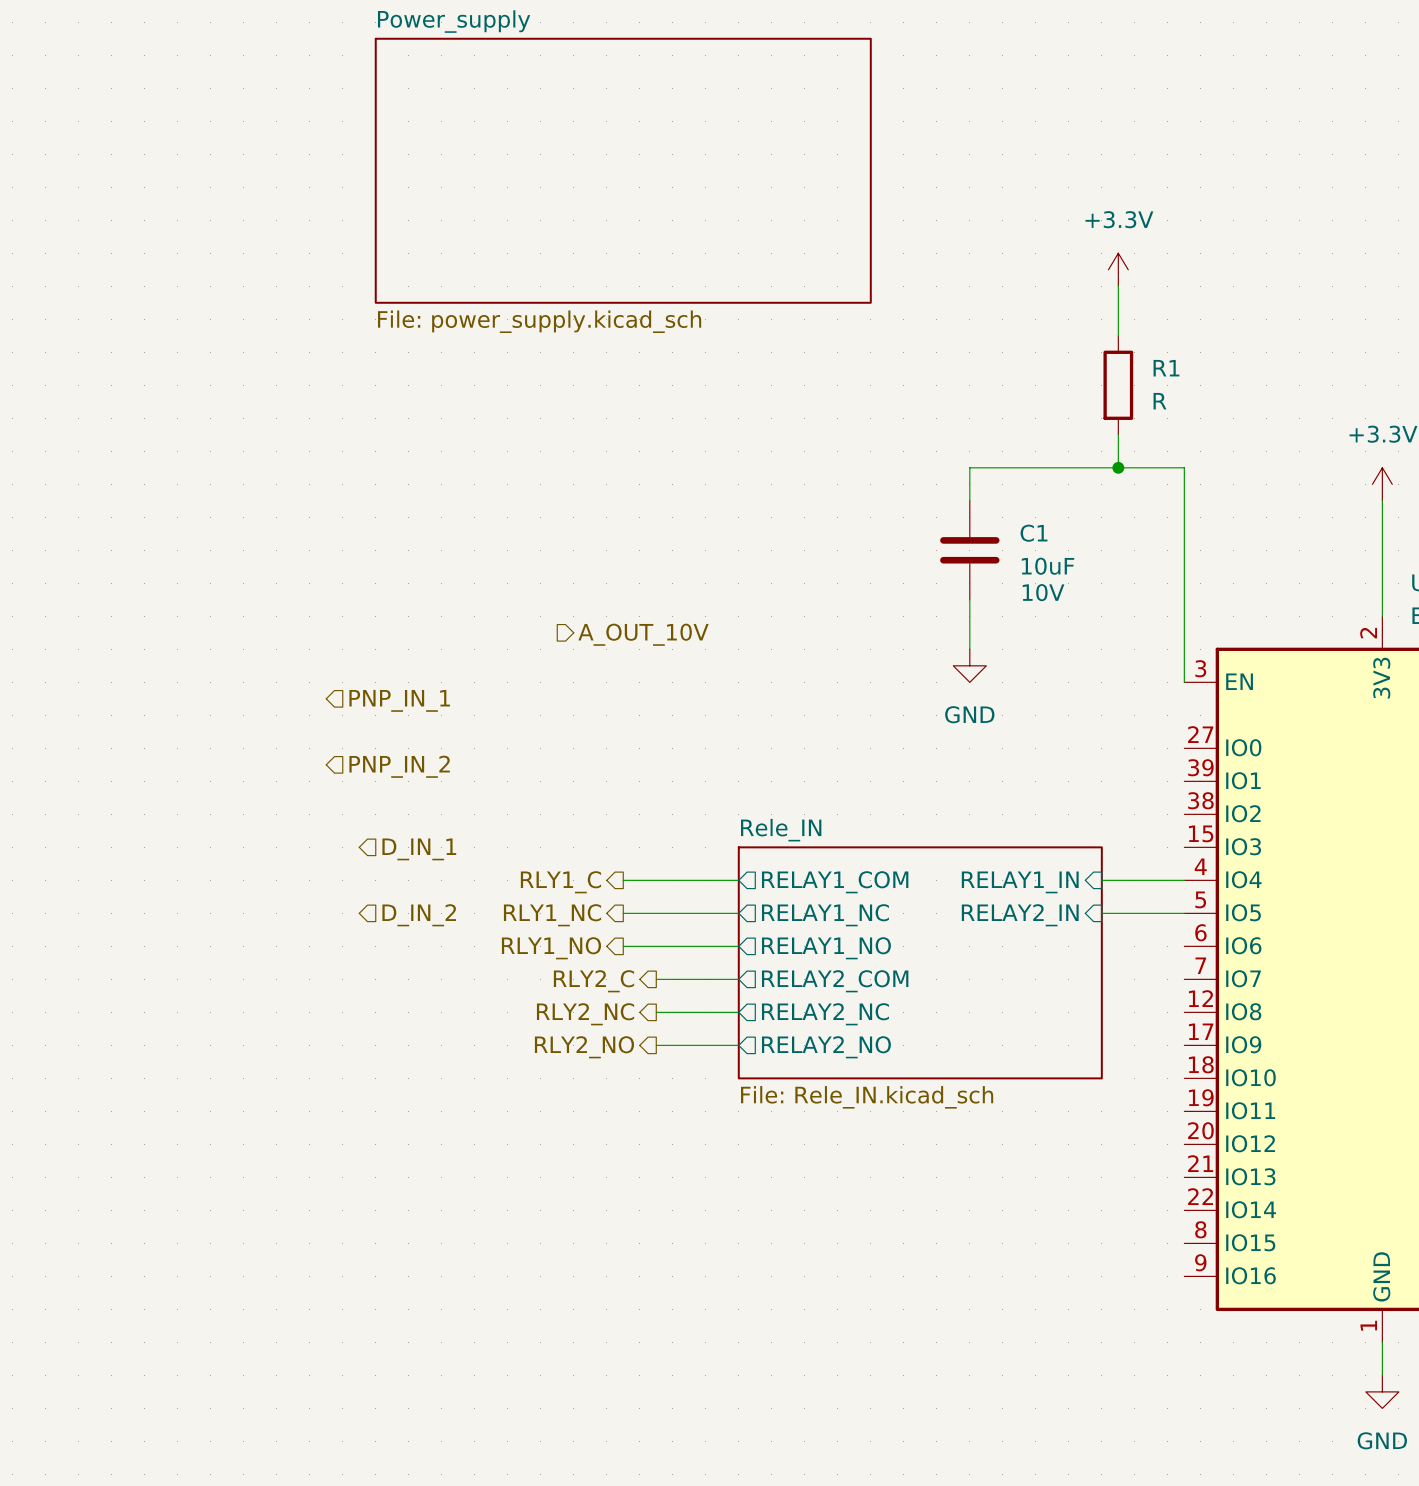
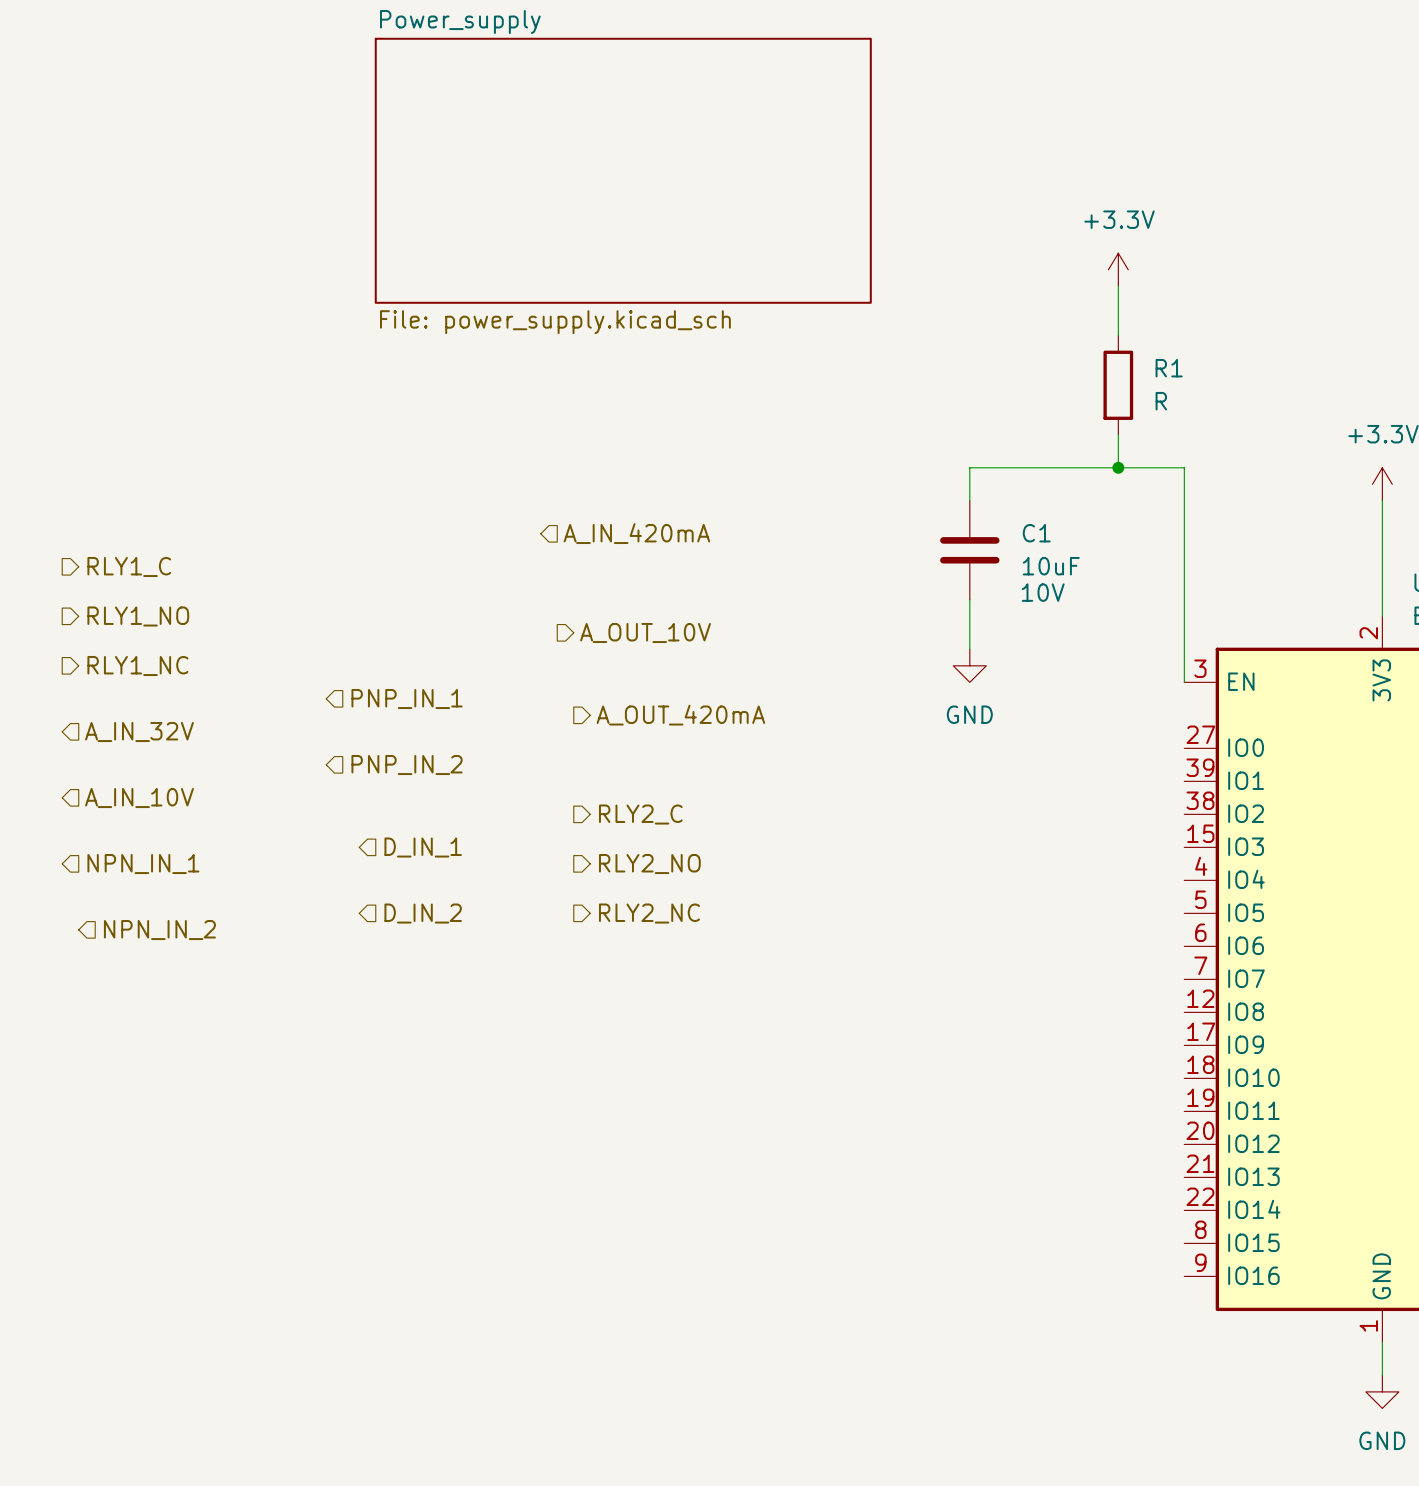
hierarchical label: none -> A_IN_420mA (636, 533)
hierarchical label: none -> RLY1_C (129, 566)
hierarchical label: none -> RLY1_NO (138, 616)
hierarchical label: none -> RLY1_NC (137, 666)
hierarchical label: none -> A_OUT_420mA (680, 715)
hierarchical label: none -> A_IN_32V (139, 732)
hierarchical label: none -> A_IN_10V (139, 798)
hierarchical label: none -> NPN_IN_1 (143, 864)
wire: (623, 880) (738, 880) -> none
wire: (1101, 880) (1184, 880) -> none
hierarchical label: RLY1_C (560, 882) -> none
sheet pin: RELAY1_COM (835, 882) -> none
sheet pin: RELAY1_IN (1020, 882) -> none
wire: (623, 913) (738, 913) -> none
wire: (1101, 913) (1184, 913) -> none
hierarchical label: RLY1_NC (552, 915) -> none
sheet pin: RELAY1_NC (825, 915) -> none
sheet pin: RELAY2_IN (1020, 915) -> none
hierarchical label: none -> NPN_IN_2 (159, 930)
wire: (623, 946) (738, 946) -> none
hierarchical label: RLY1_NO (551, 948) -> none
sheet pin: RELAY1_NO (826, 948) -> none
sheet Rele_IN: File: Rele_IN.kicad_sch (920, 962) -> none
wire: (656, 979) (738, 979) -> none
hierarchical label rotation: 0° (593, 981) -> 180° (640, 814)
hierarchical label position: RLY2_C (593, 981) -> RLY2_C (640, 814)
sheet pin: RELAY2_COM (835, 981) -> none
wire: (656, 1012) (738, 1012) -> none
hierarchical label rotation: 0° (585, 1014) -> 180° (649, 913)
hierarchical label position: RLY2_NC (585, 1014) -> RLY2_NC (649, 913)
sheet pin: RELAY2_NC (825, 1014) -> none
wire: (656, 1045) (738, 1045) -> none
hierarchical label rotation: 0° (584, 1047) -> 180° (649, 864)
hierarchical label position: RLY2_NO (584, 1047) -> RLY2_NO (649, 864)
sheet pin: RELAY2_NO (826, 1047) -> none

